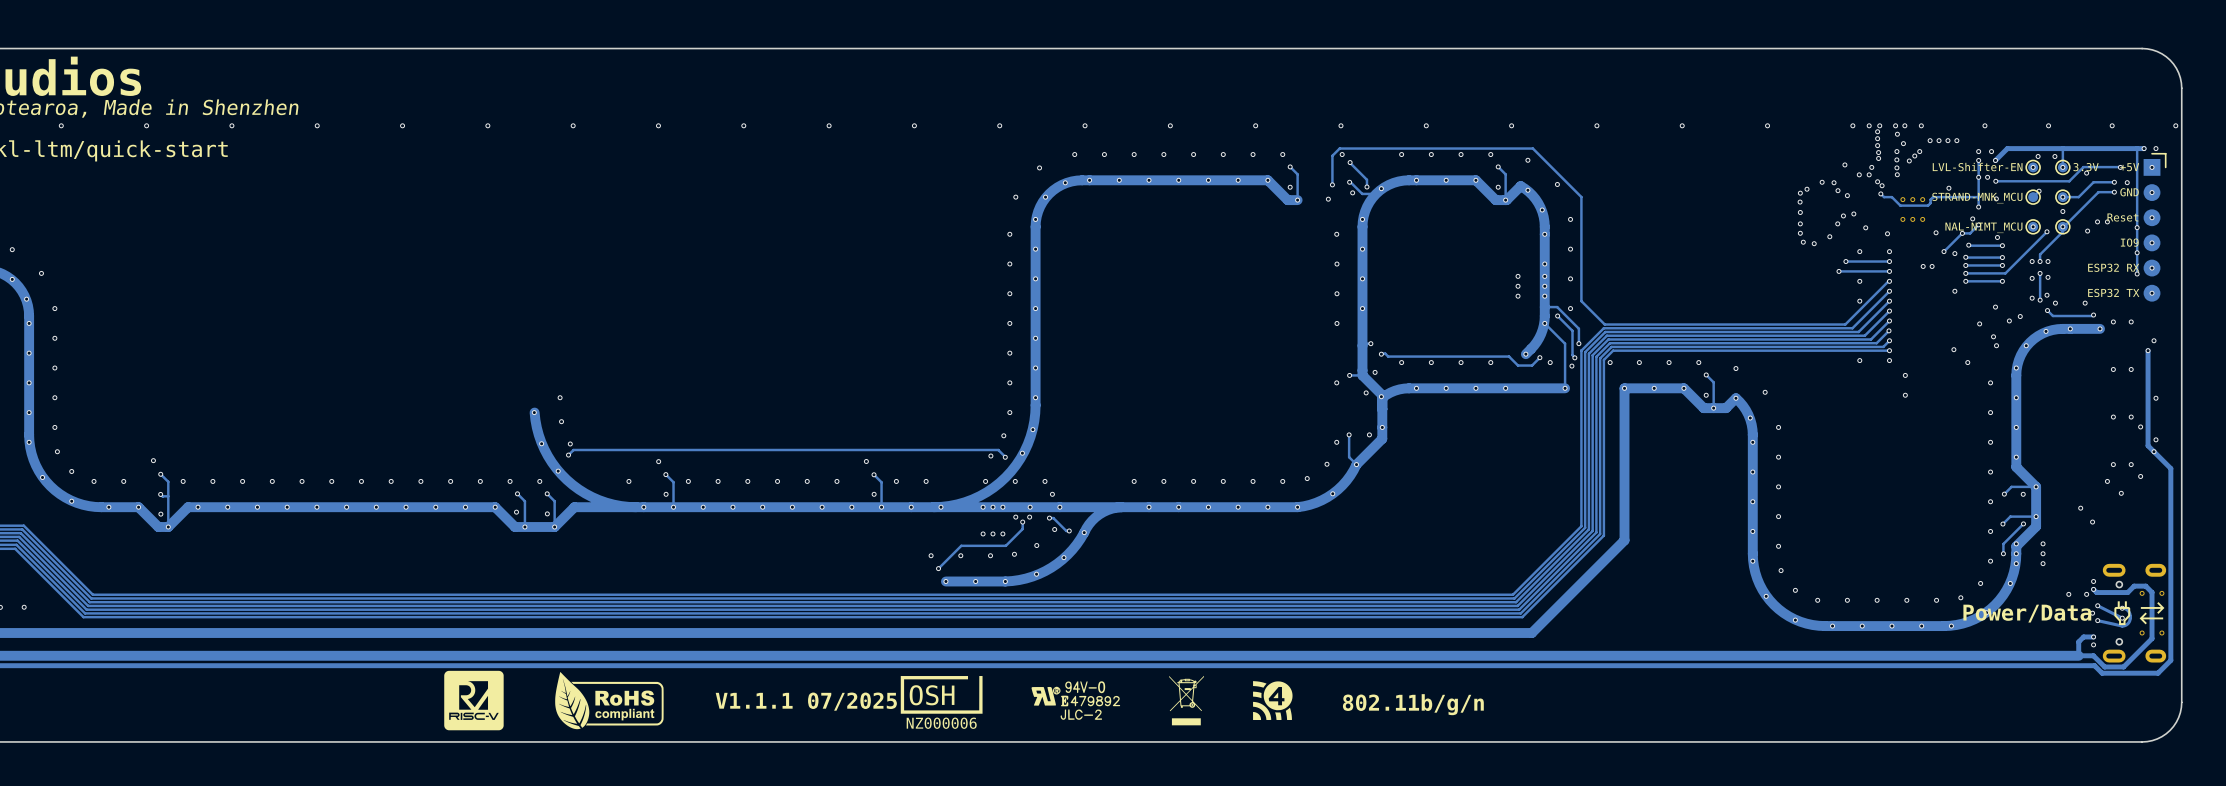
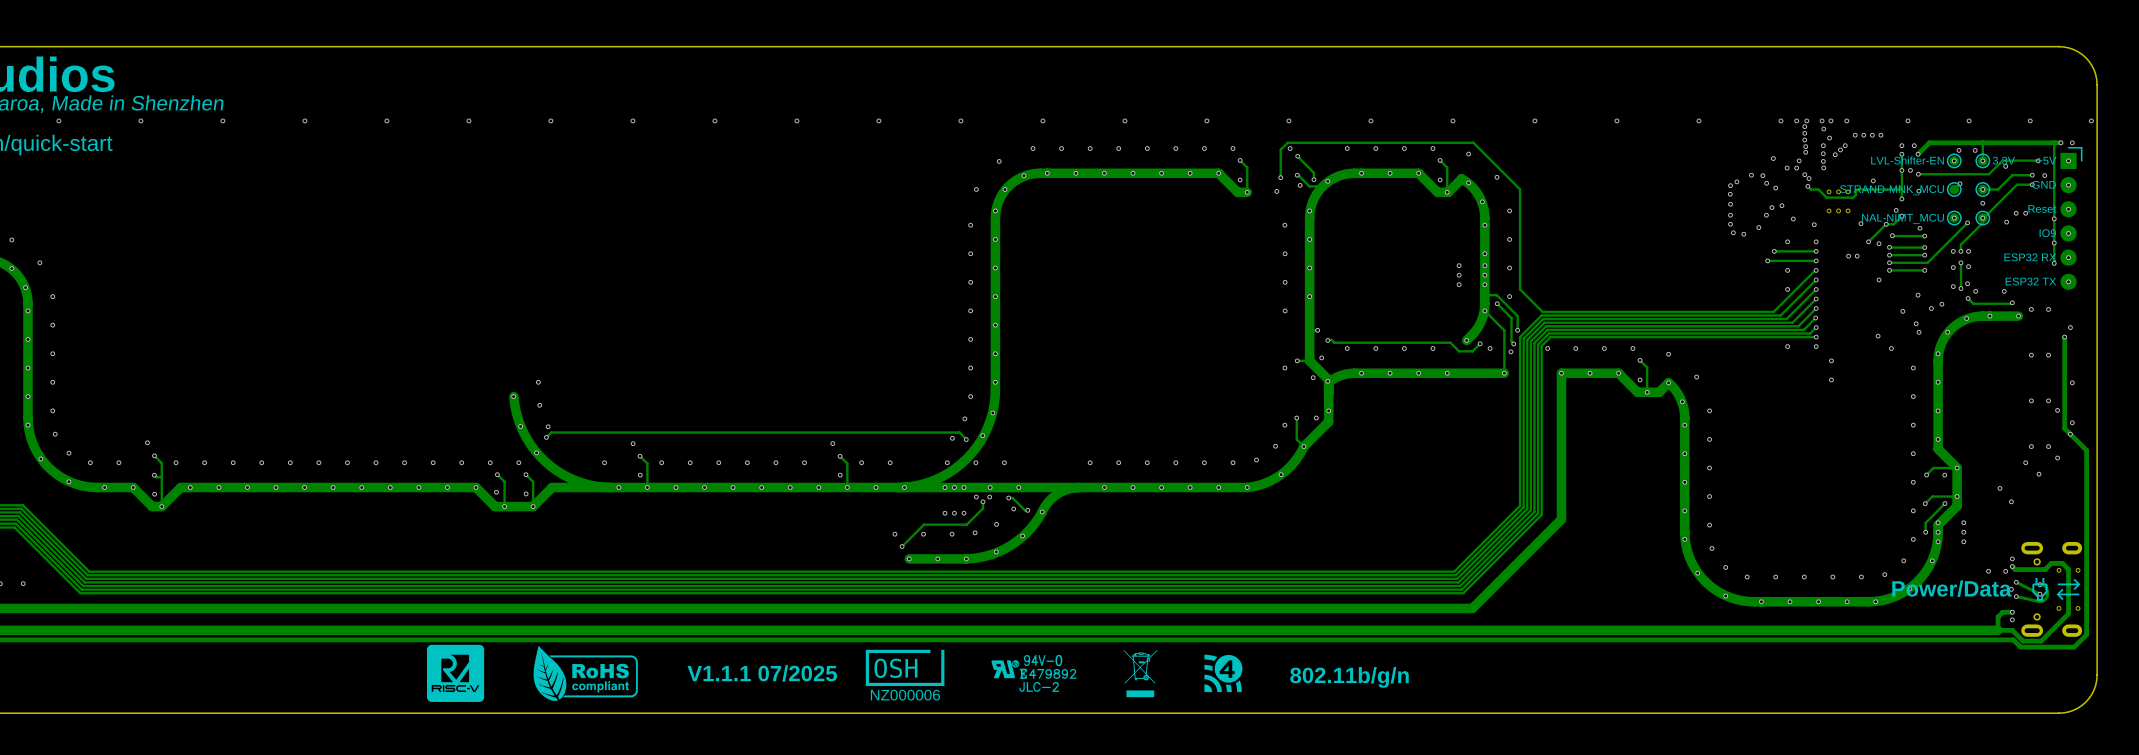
via: (1052, 494) -> none

